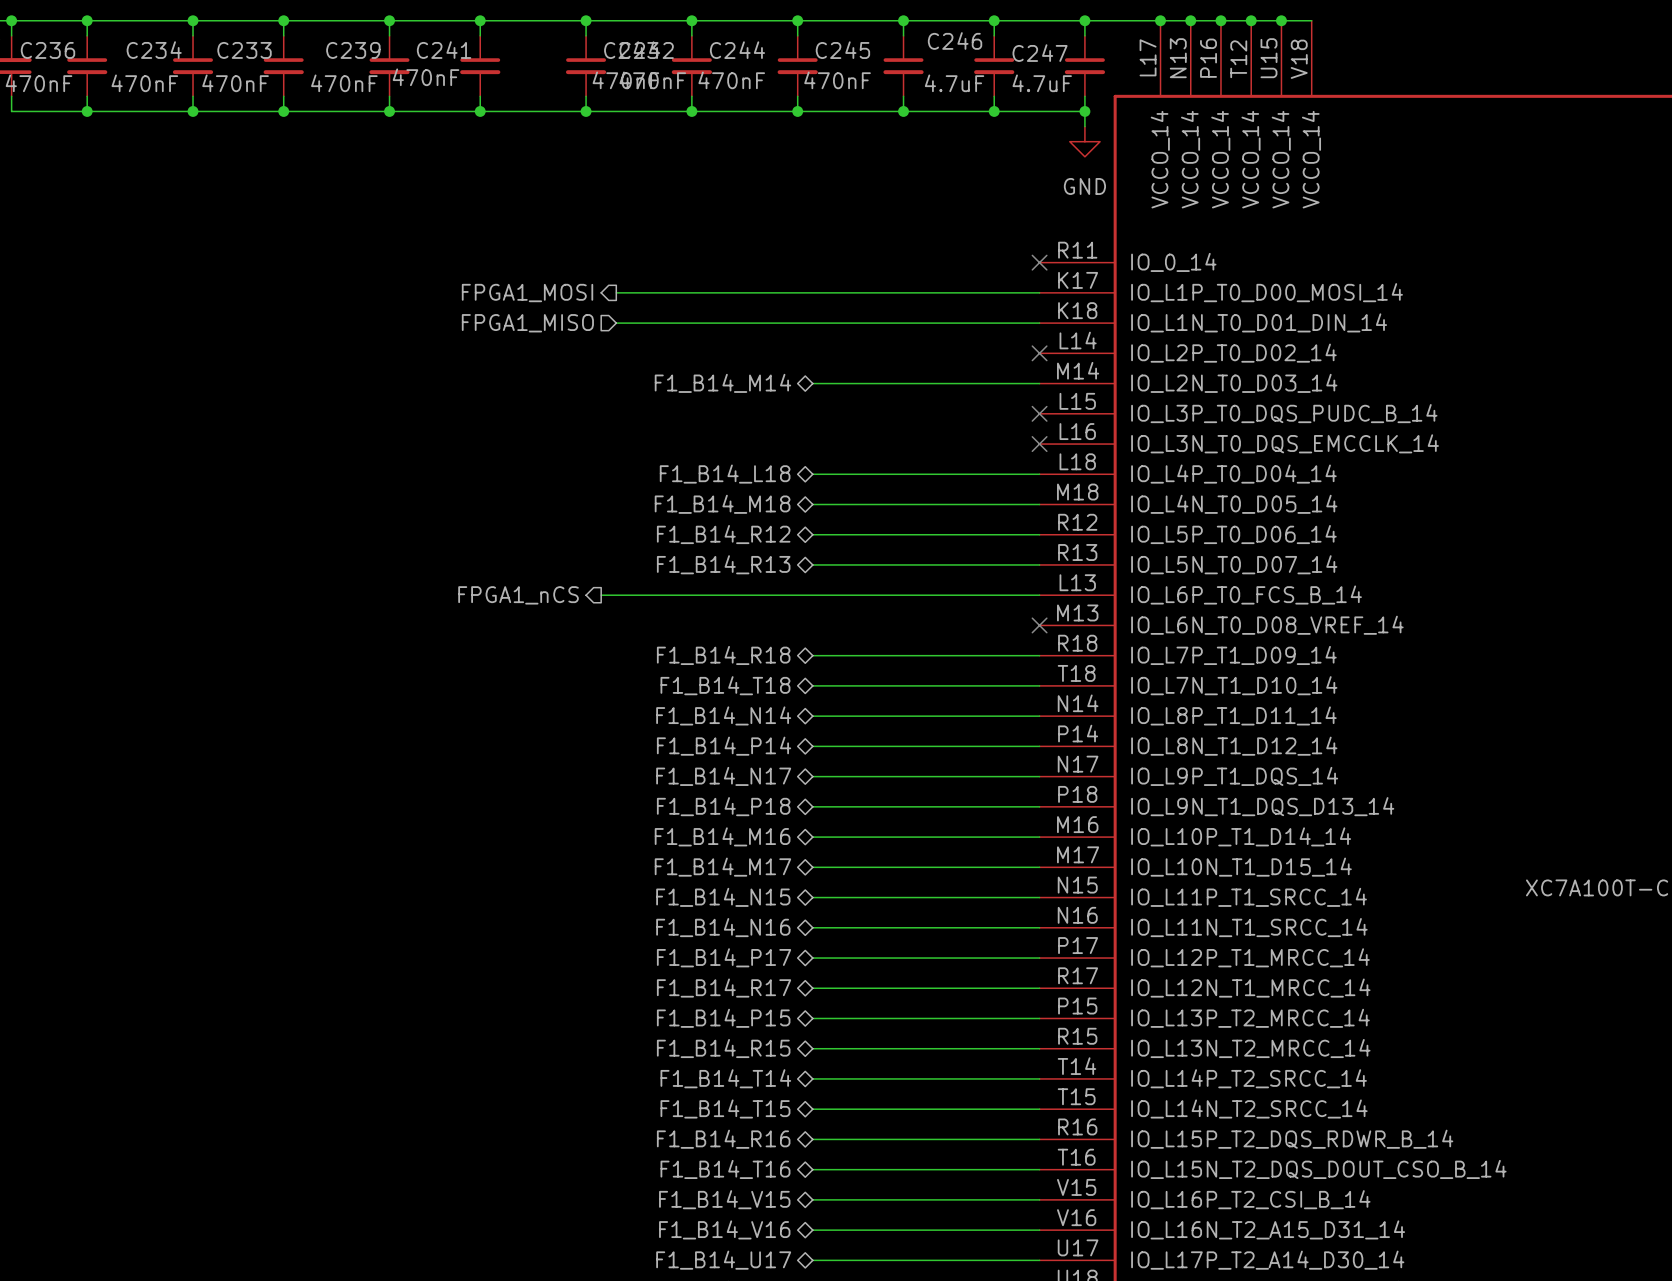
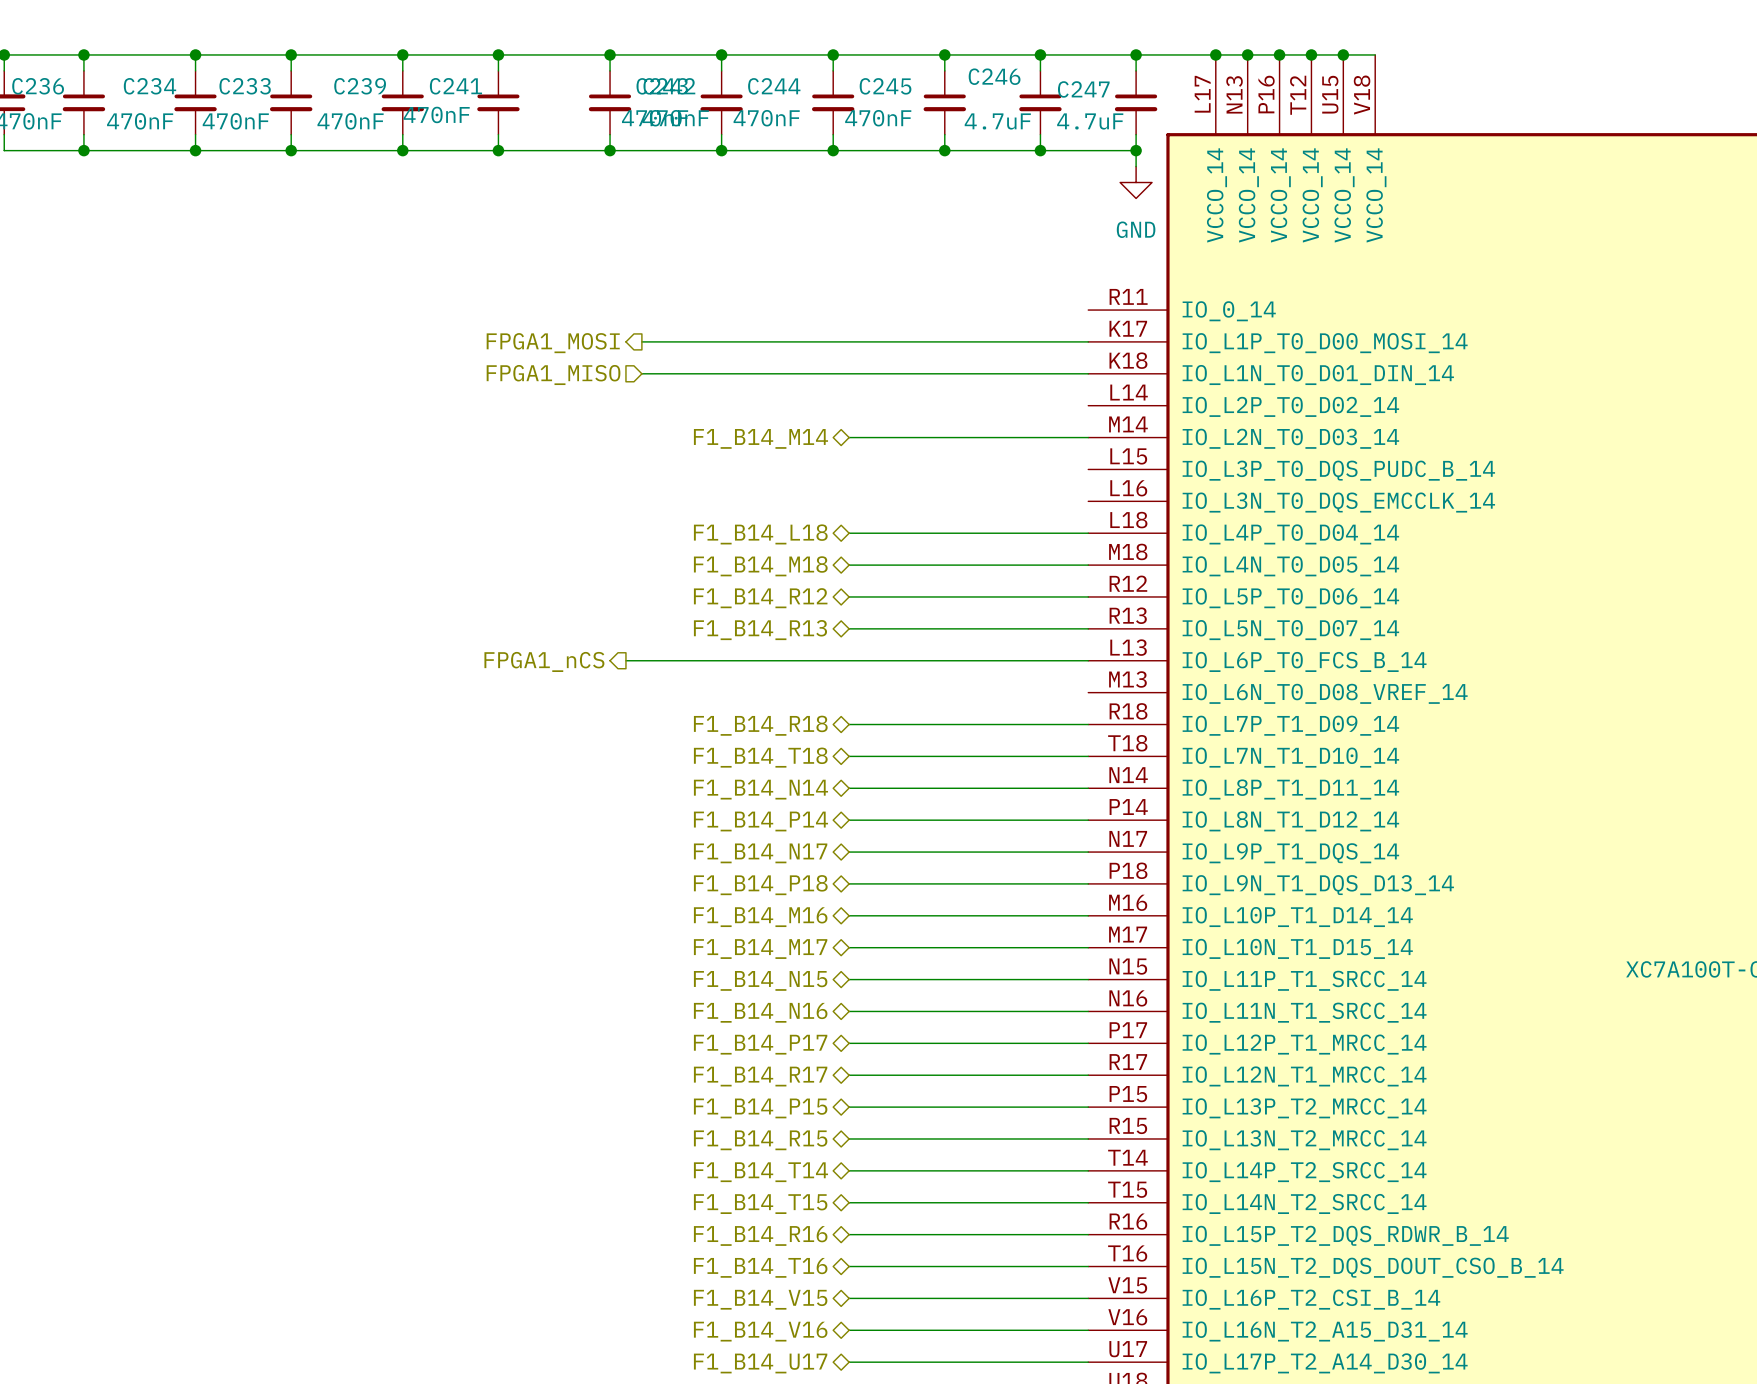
no-connect mark: (1039, 262) -> none
no-connect mark: (1039, 353) -> none
no-connect mark: (1039, 413) -> none
no-connect mark: (1039, 444) -> none
no-connect mark: (1039, 625) -> none

